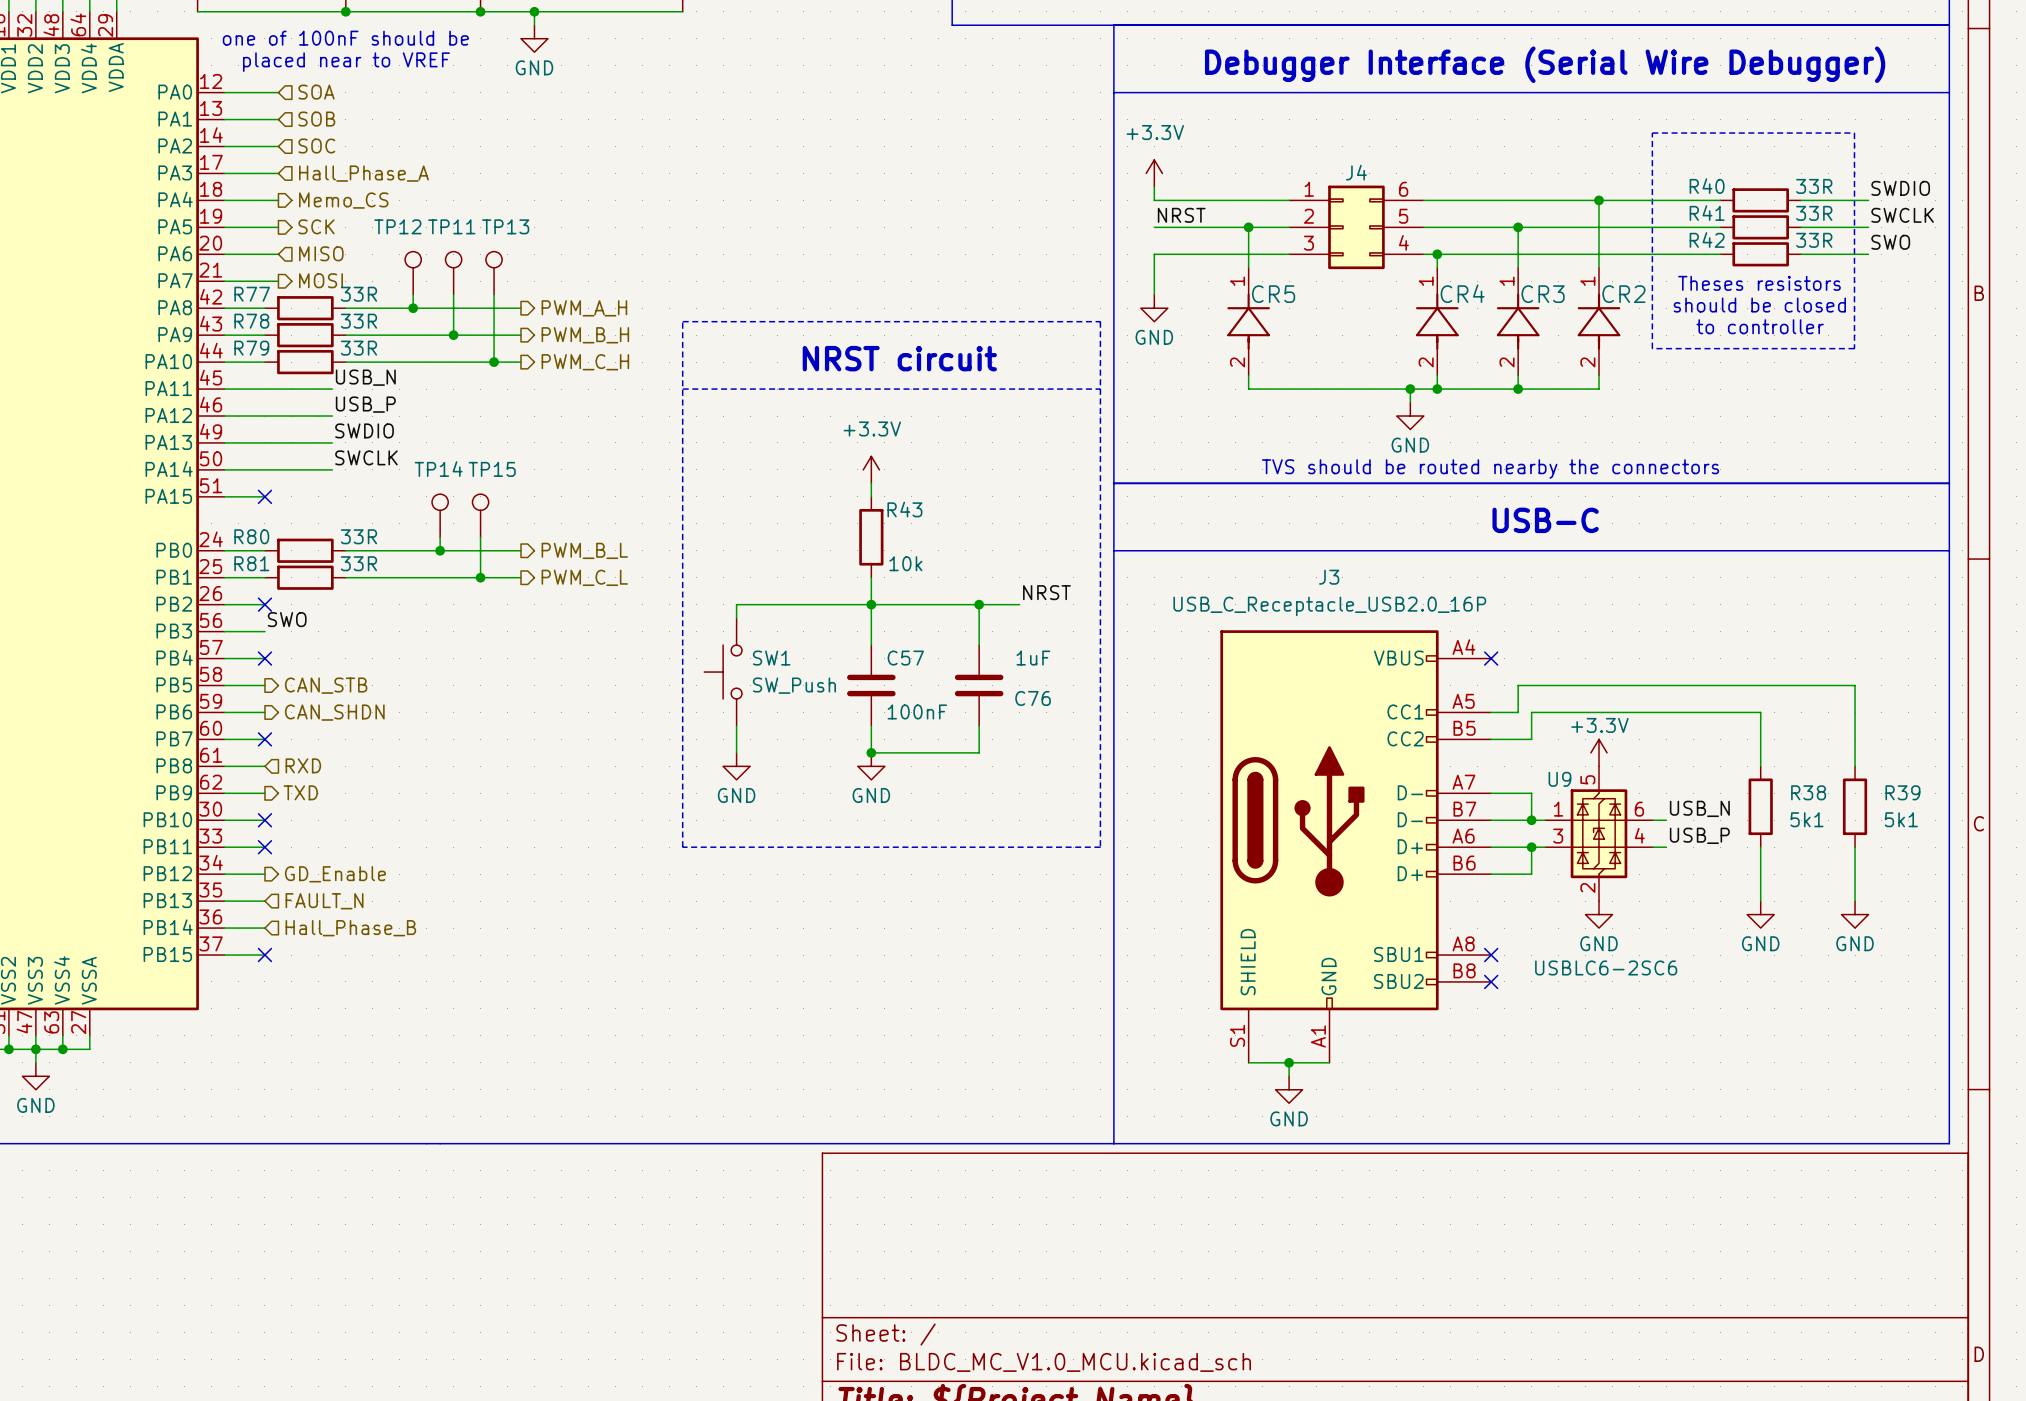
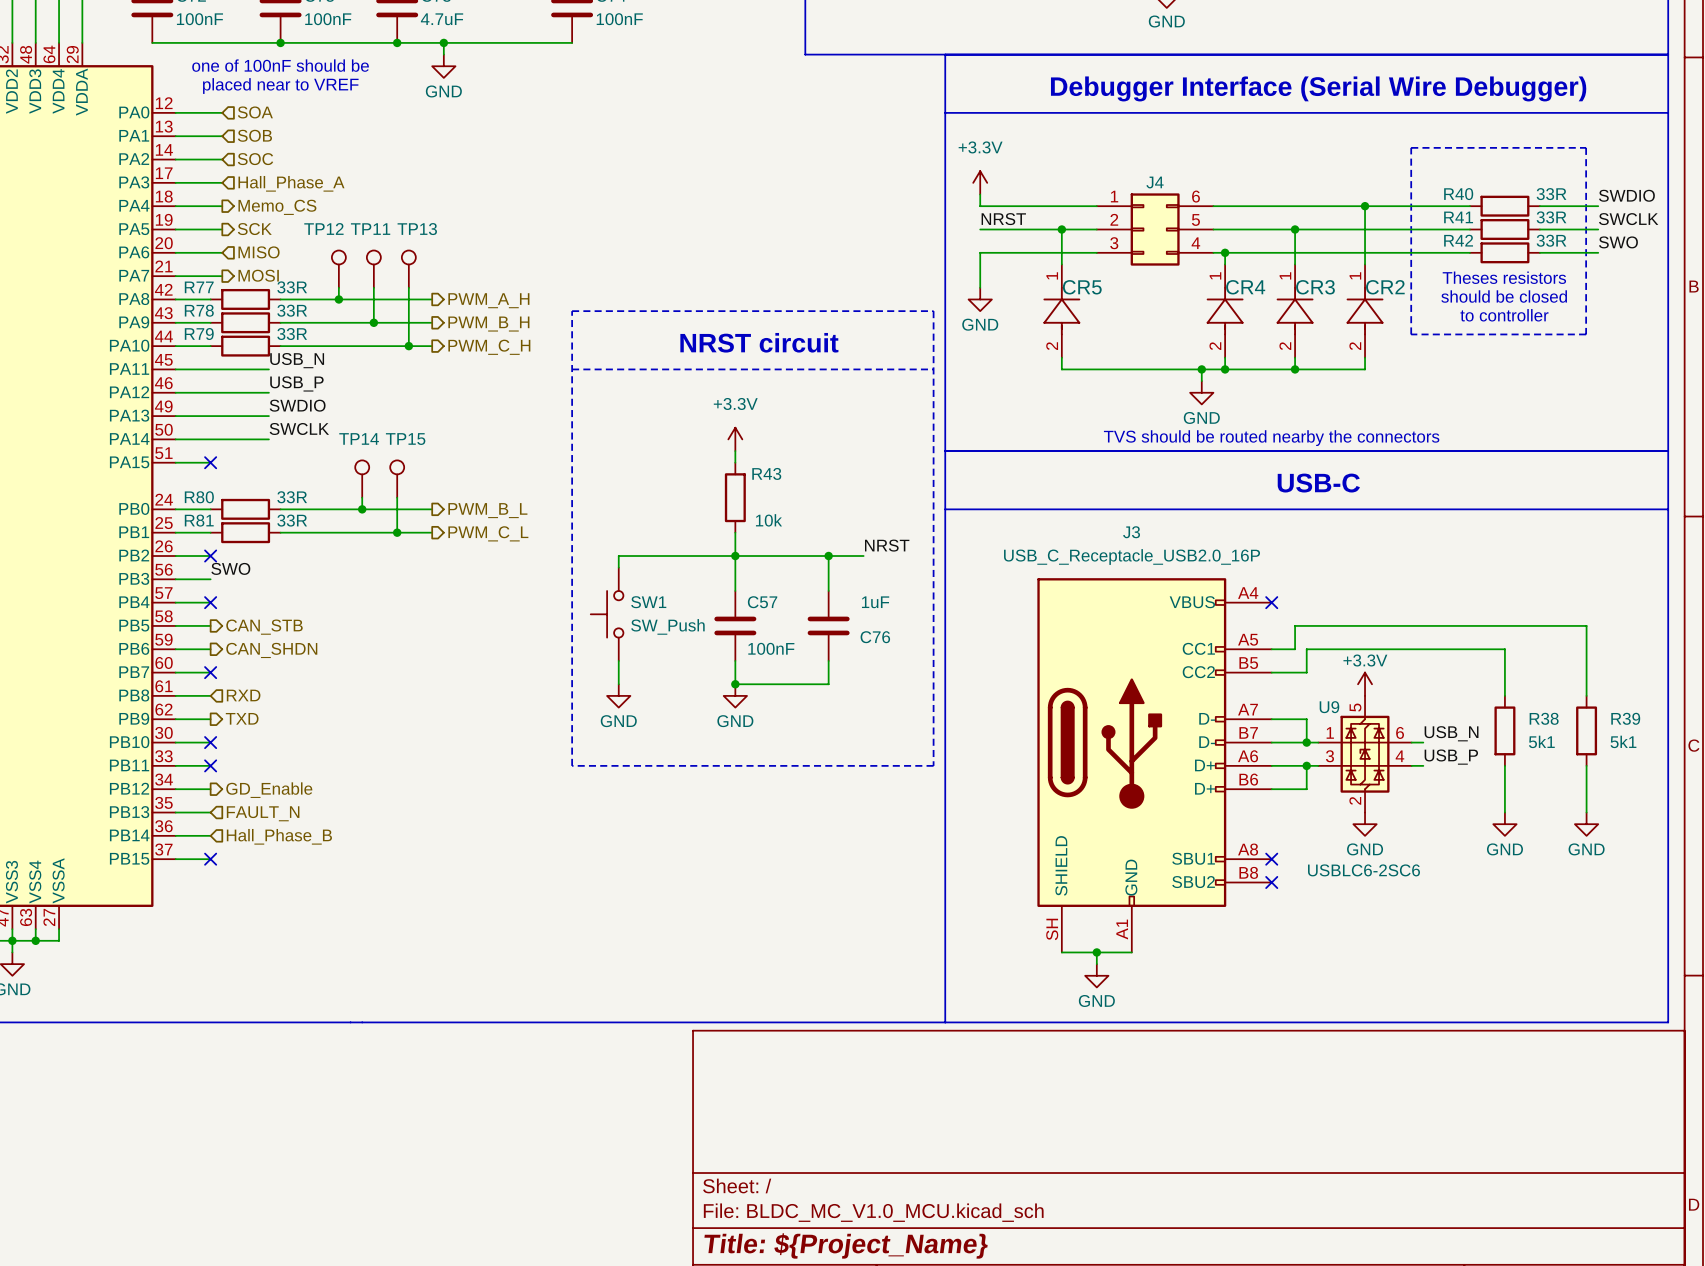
J3 pin number: S1 (1237, 1035) -> SH (1052, 929)

